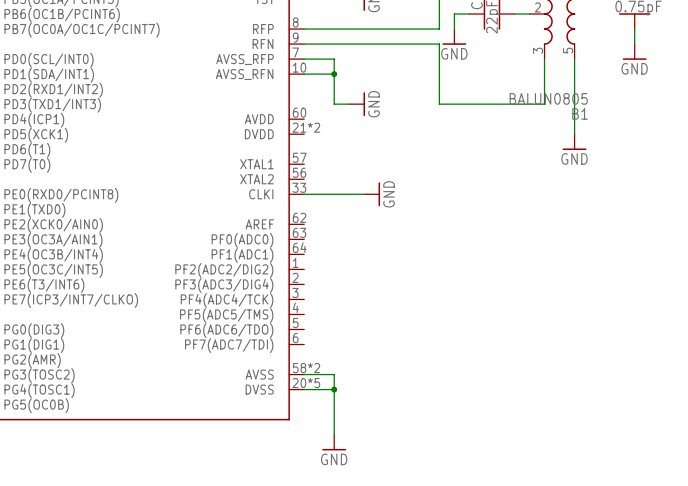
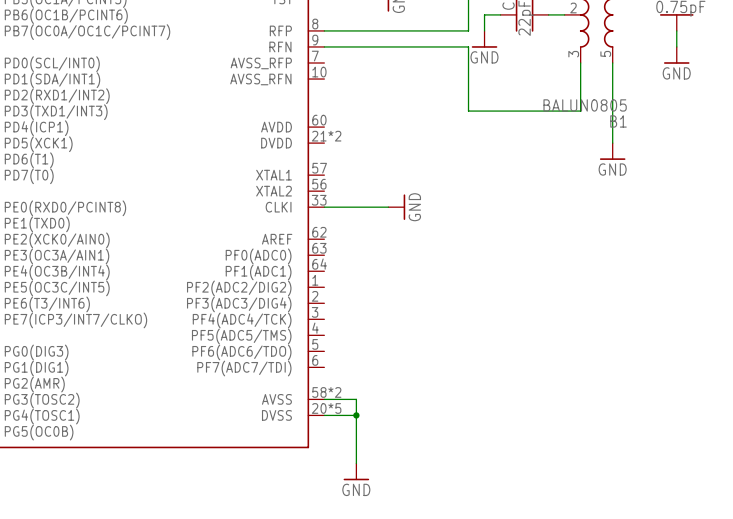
wire: (304, 59) (334, 59) (334, 104) (349, 104) -> none
wire: (304, 74) (334, 74) -> none
junction: (334, 74) -> none
power symbol: GND (357, 104) -> none

